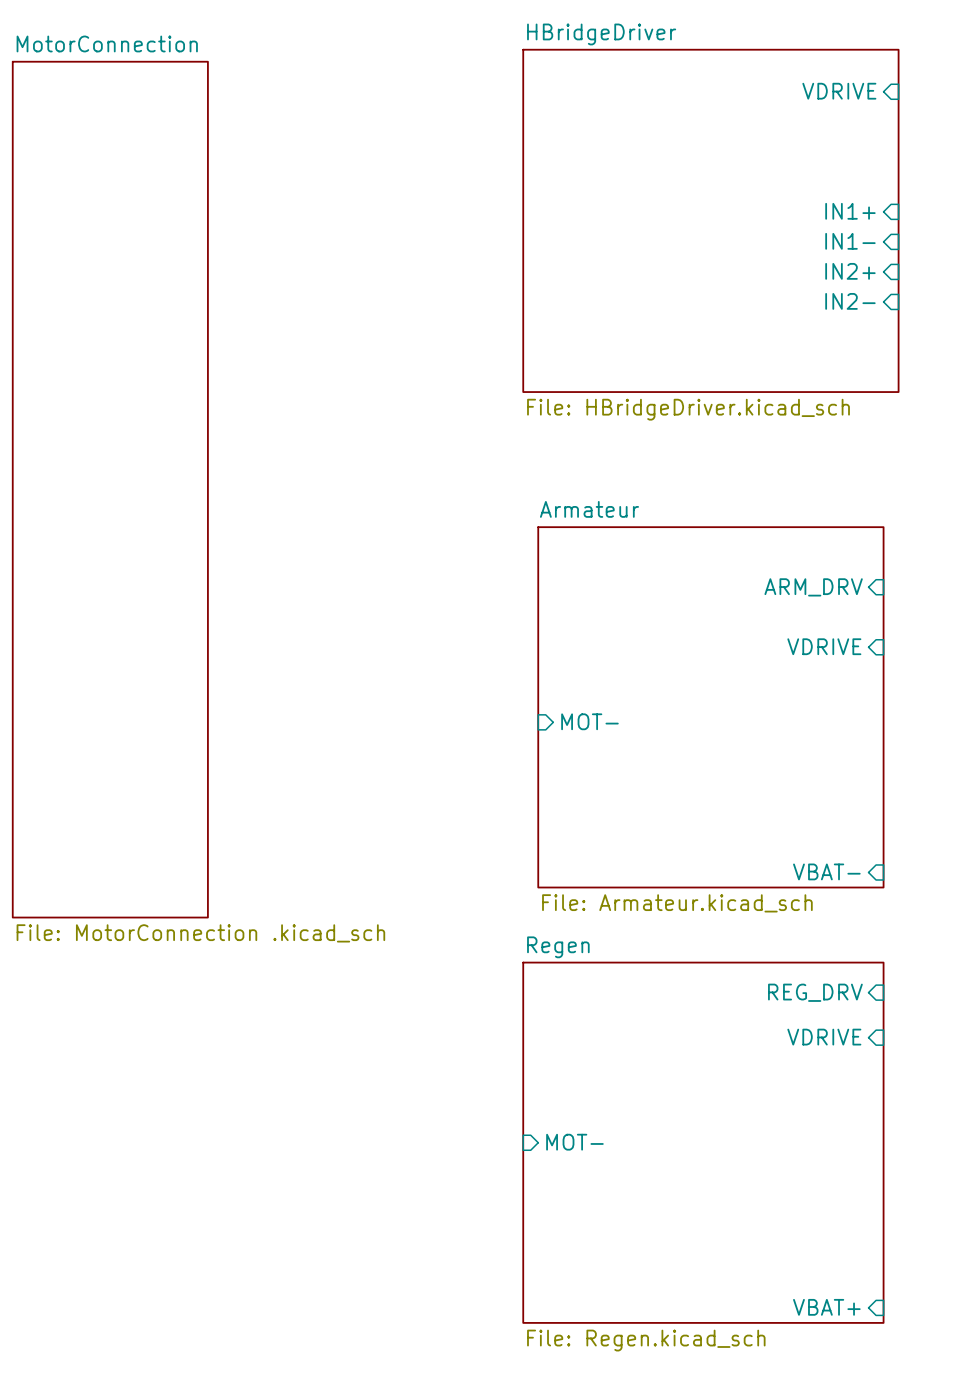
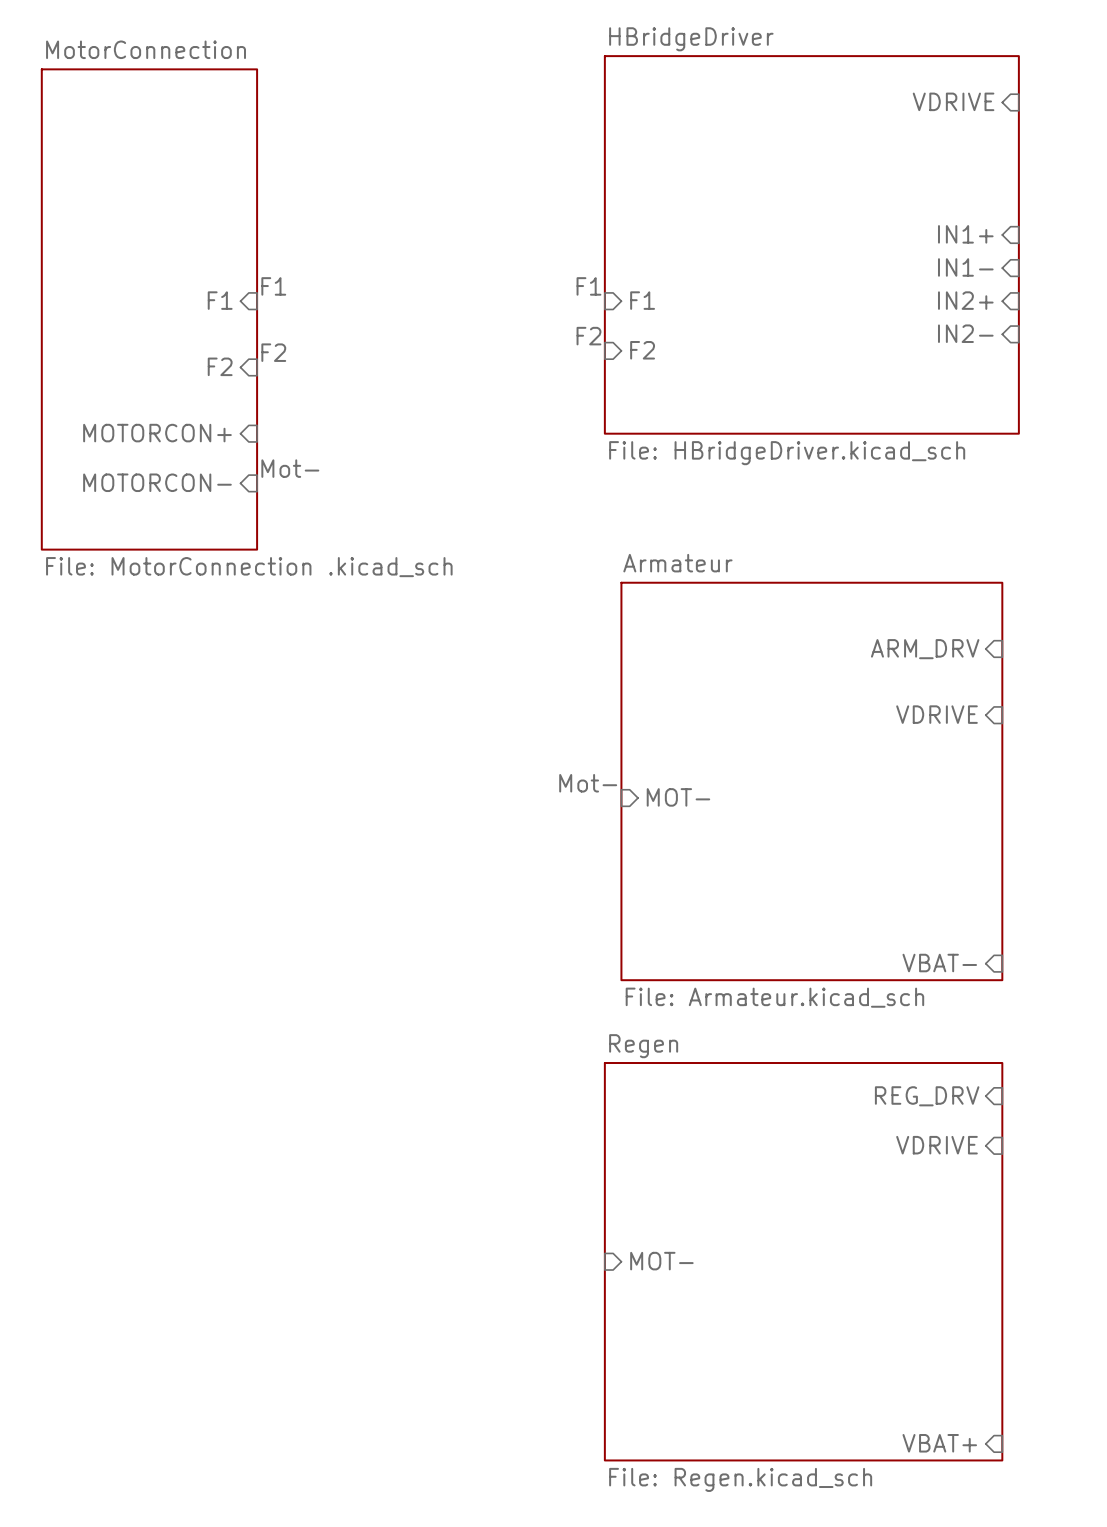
label: none -> F1 (273, 286)
label: none -> F1 (588, 286)
sheet pin: none -> F1 (220, 300)
sheet pin: none -> F1 (642, 300)
sheet MotorConnection: none -> File: MotorConnection .kicad_sch (149, 309)
label: none -> F2 (588, 336)
sheet pin: none -> F2 (642, 350)
label: none -> F2 (273, 352)
sheet pin: none -> F2 (220, 366)
sheet pin: none -> MOTORCON+ (157, 433)
label: none -> Mot- (290, 468)
sheet pin: none -> MOTORCON- (157, 482)
sheet MotorConnection: File: MotorConnection .kicad_sch (110, 489) -> none
label: none -> Mot- (588, 783)

